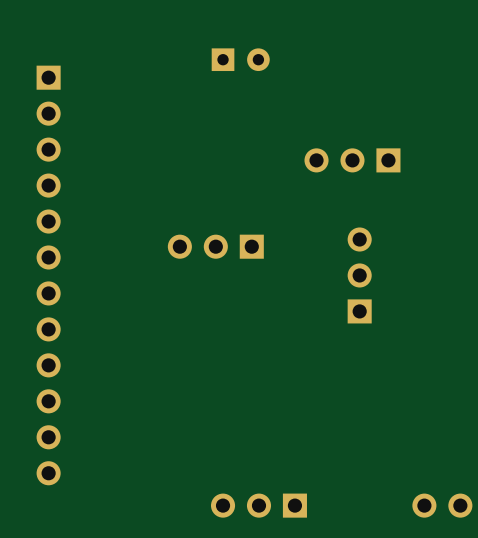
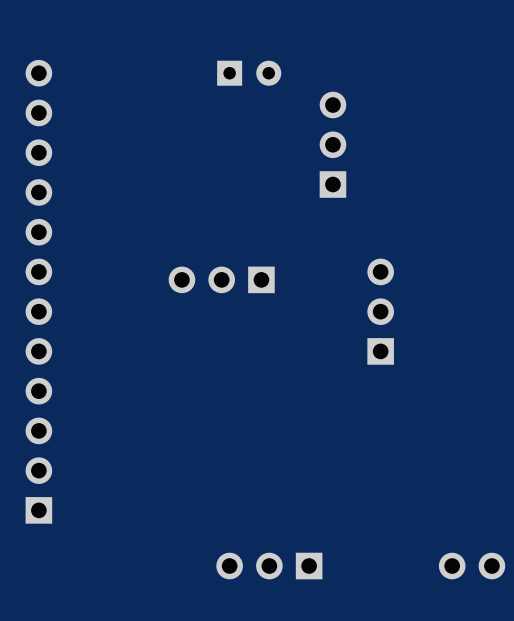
part rotation: 0° (352, 160) -> 90° clockwise (332, 144)
part rotation: 0° (48, 275) -> 180° (38, 291)

